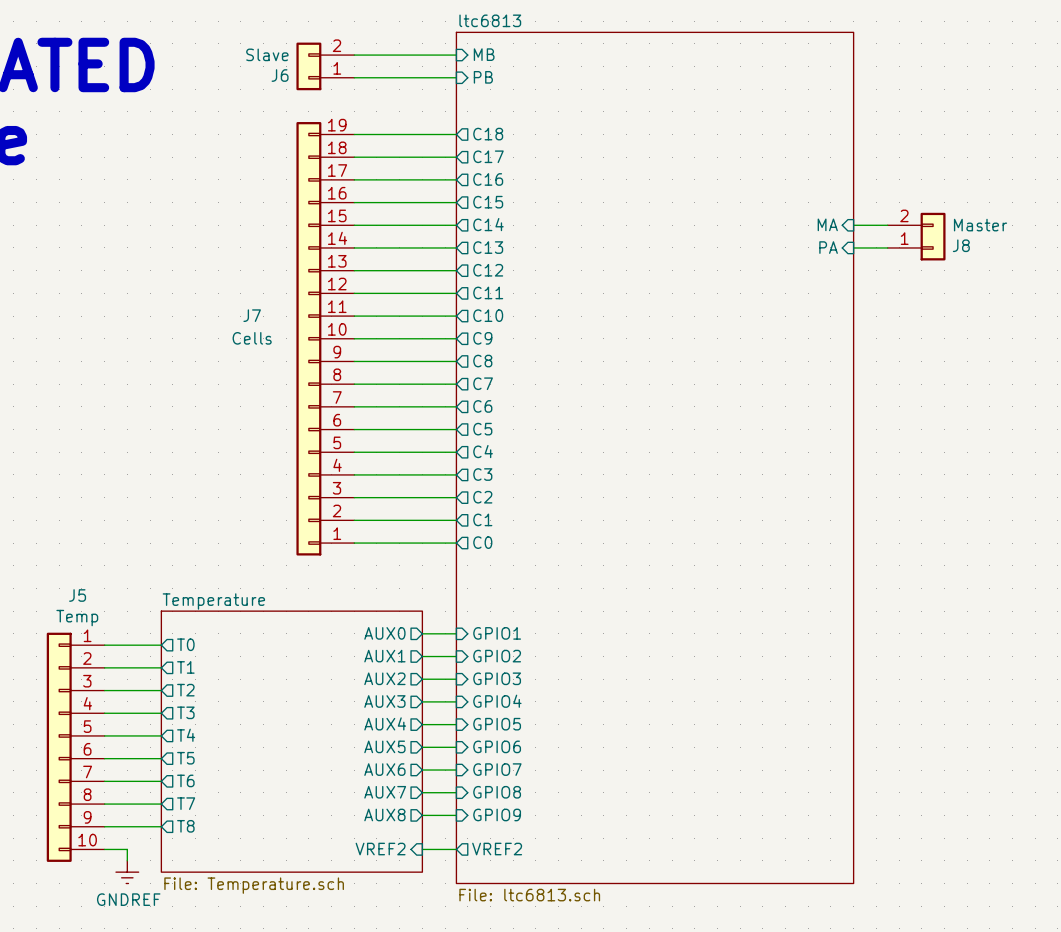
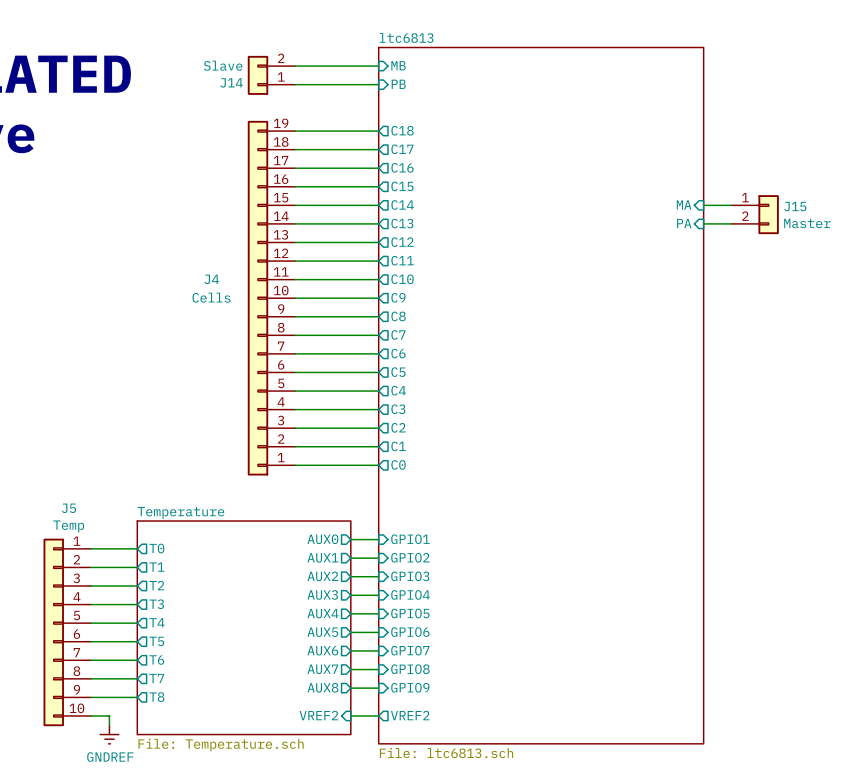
J6 name: J6 (280, 75) -> J14 (231, 82)
J8 flip: as is (933, 236) -> up-down (768, 214)
J8 name: J8 (961, 245) -> J15 (795, 206)
J7 name: J7 (252, 315) -> J4 (211, 279)

